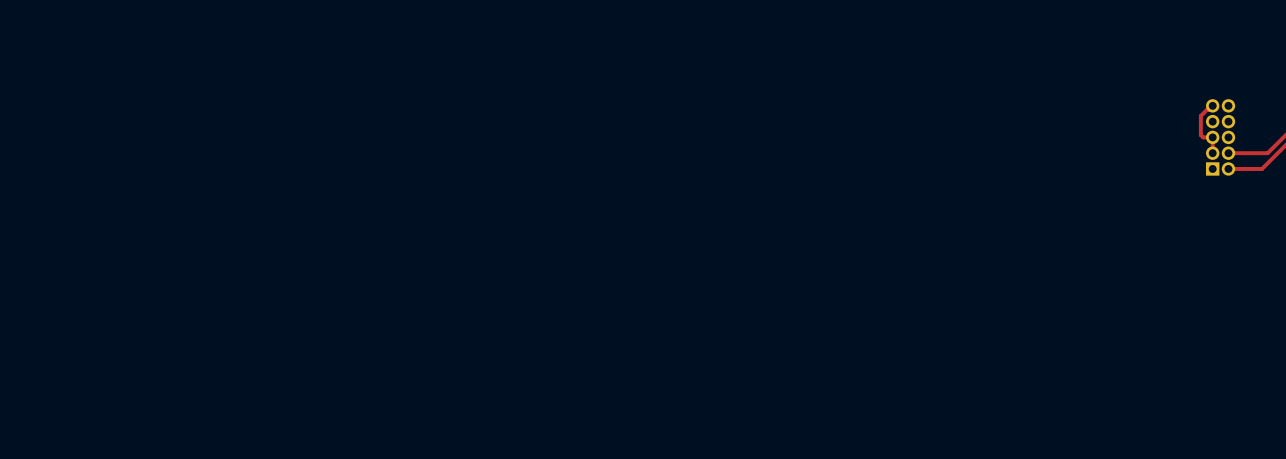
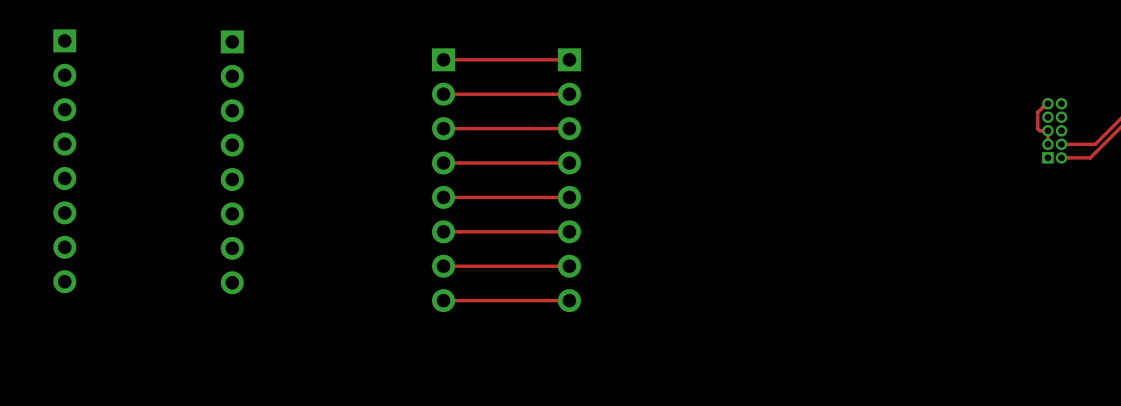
top track: none -> (569, 59) (443, 59)
top track: none -> (569, 94) (443, 94)
top track: none -> (569, 128) (443, 128)
part: none -> (64, 161)
part: none -> (232, 162)
top track: none -> (569, 163) (443, 163)
part: none -> (443, 180)
part: none -> (569, 180)
top track: none -> (569, 197) (443, 197)
top track: none -> (569, 231) (443, 231)
top track: none -> (569, 266) (443, 266)
top track: none -> (569, 300) (443, 300)

